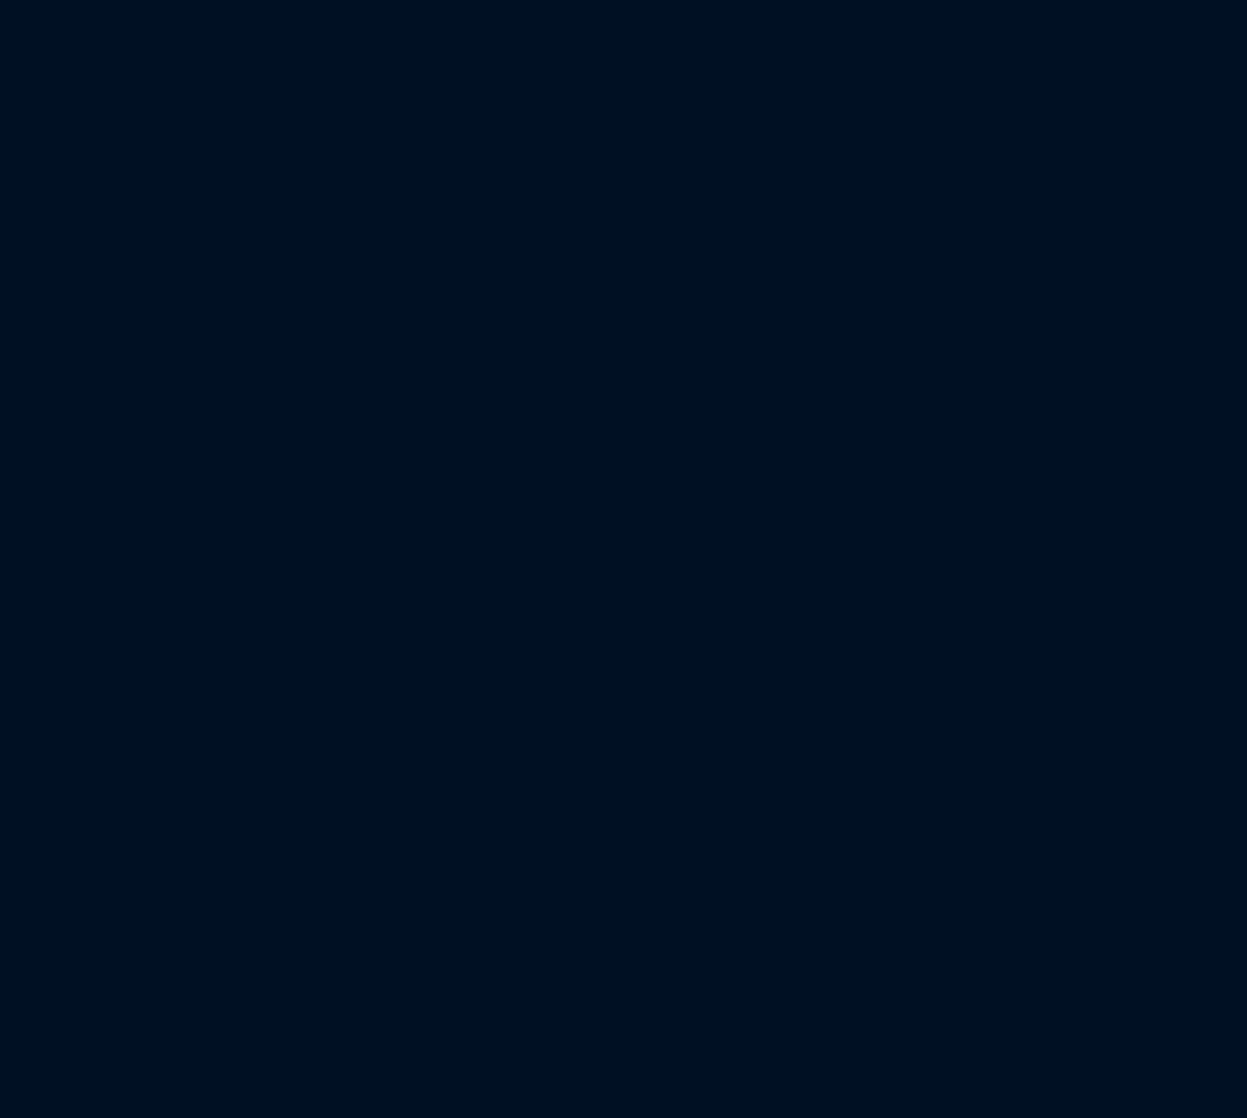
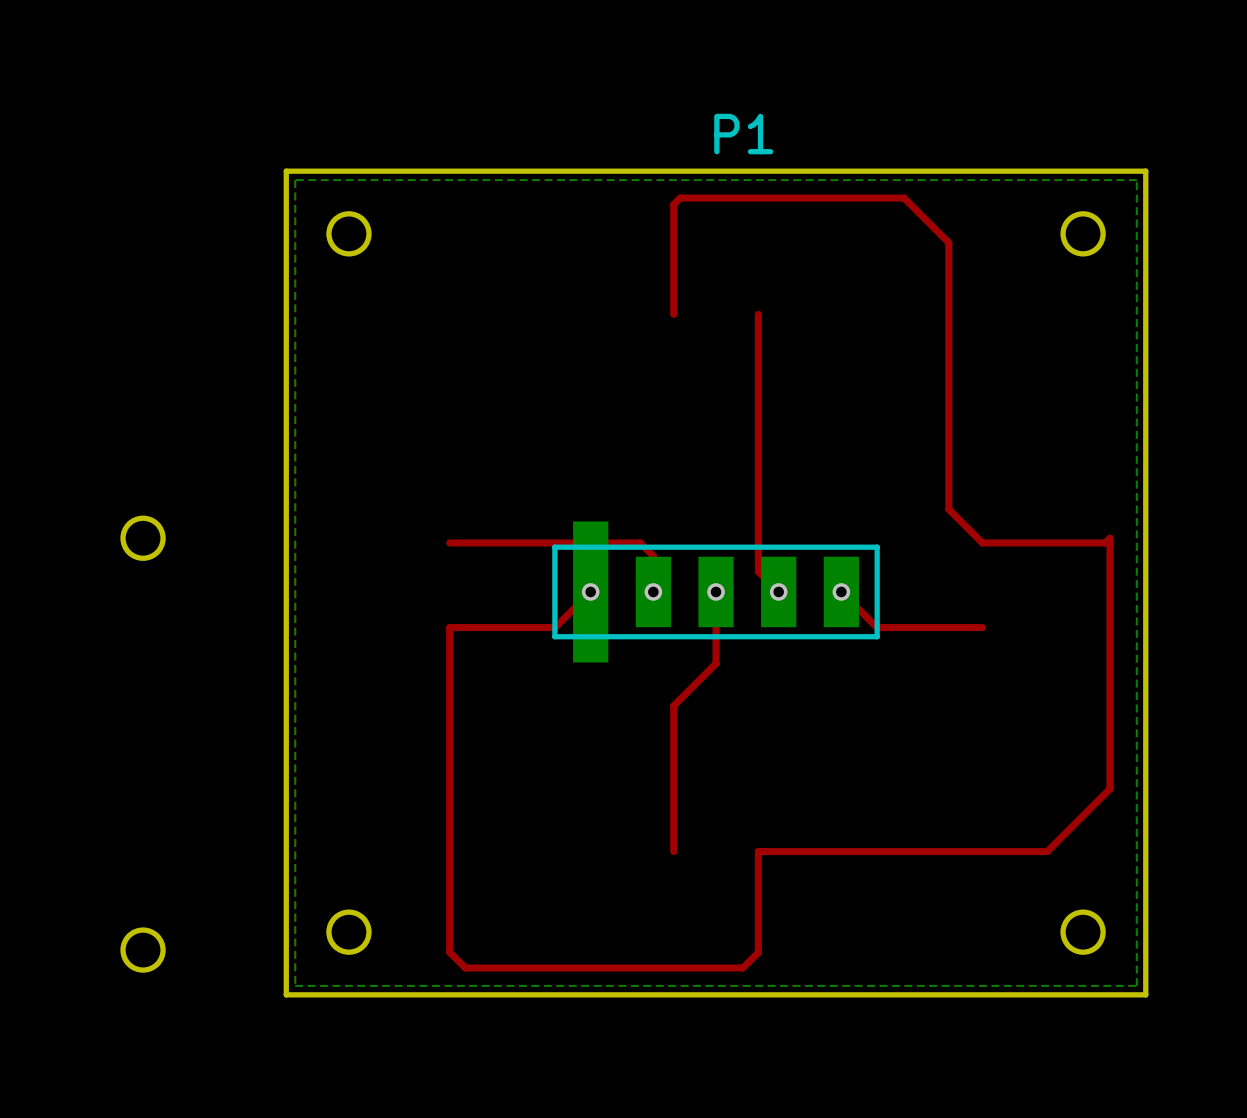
board edge: none -> (1145, 171) (1145, 994) (286, 994) (286, 171) (1145, 171)
bottom zone outline: none -> (1136, 180) (1136, 985) (295, 985) (295, 180) (1136, 180)
round board edge: none -> [326, 211, 372, 257]
round board edge: none -> [1060, 211, 1106, 257]
top track: none -> (673, 314) (673, 204) (680, 198) (904, 198) (948, 242) (948, 509) (982, 542) (1105, 542) (1109, 538) (1109, 788) (1047, 851) (758, 851) (758, 952) (742, 967) (465, 967) (449, 952) (449, 627) (555, 627) (590, 591)
top track: none -> (758, 314) (758, 571) (778, 591)
round board edge: none -> [120, 515, 166, 561]
top track: none -> (449, 542) (640, 542) (653, 556) (653, 591)
via: none -> (590, 591)
via: none -> (653, 591)
top track: none -> (716, 591) (716, 663) (673, 705) (673, 851)
P1: none -> (716, 591)
via: none -> (716, 591)
via: none -> (778, 591)
top track: none -> (841, 591) (876, 627) (982, 627)
via: none -> (841, 591)
round board edge: none -> [326, 909, 372, 955]
round board edge: none -> [1060, 909, 1106, 955]
round board edge: none -> [120, 927, 166, 973]

